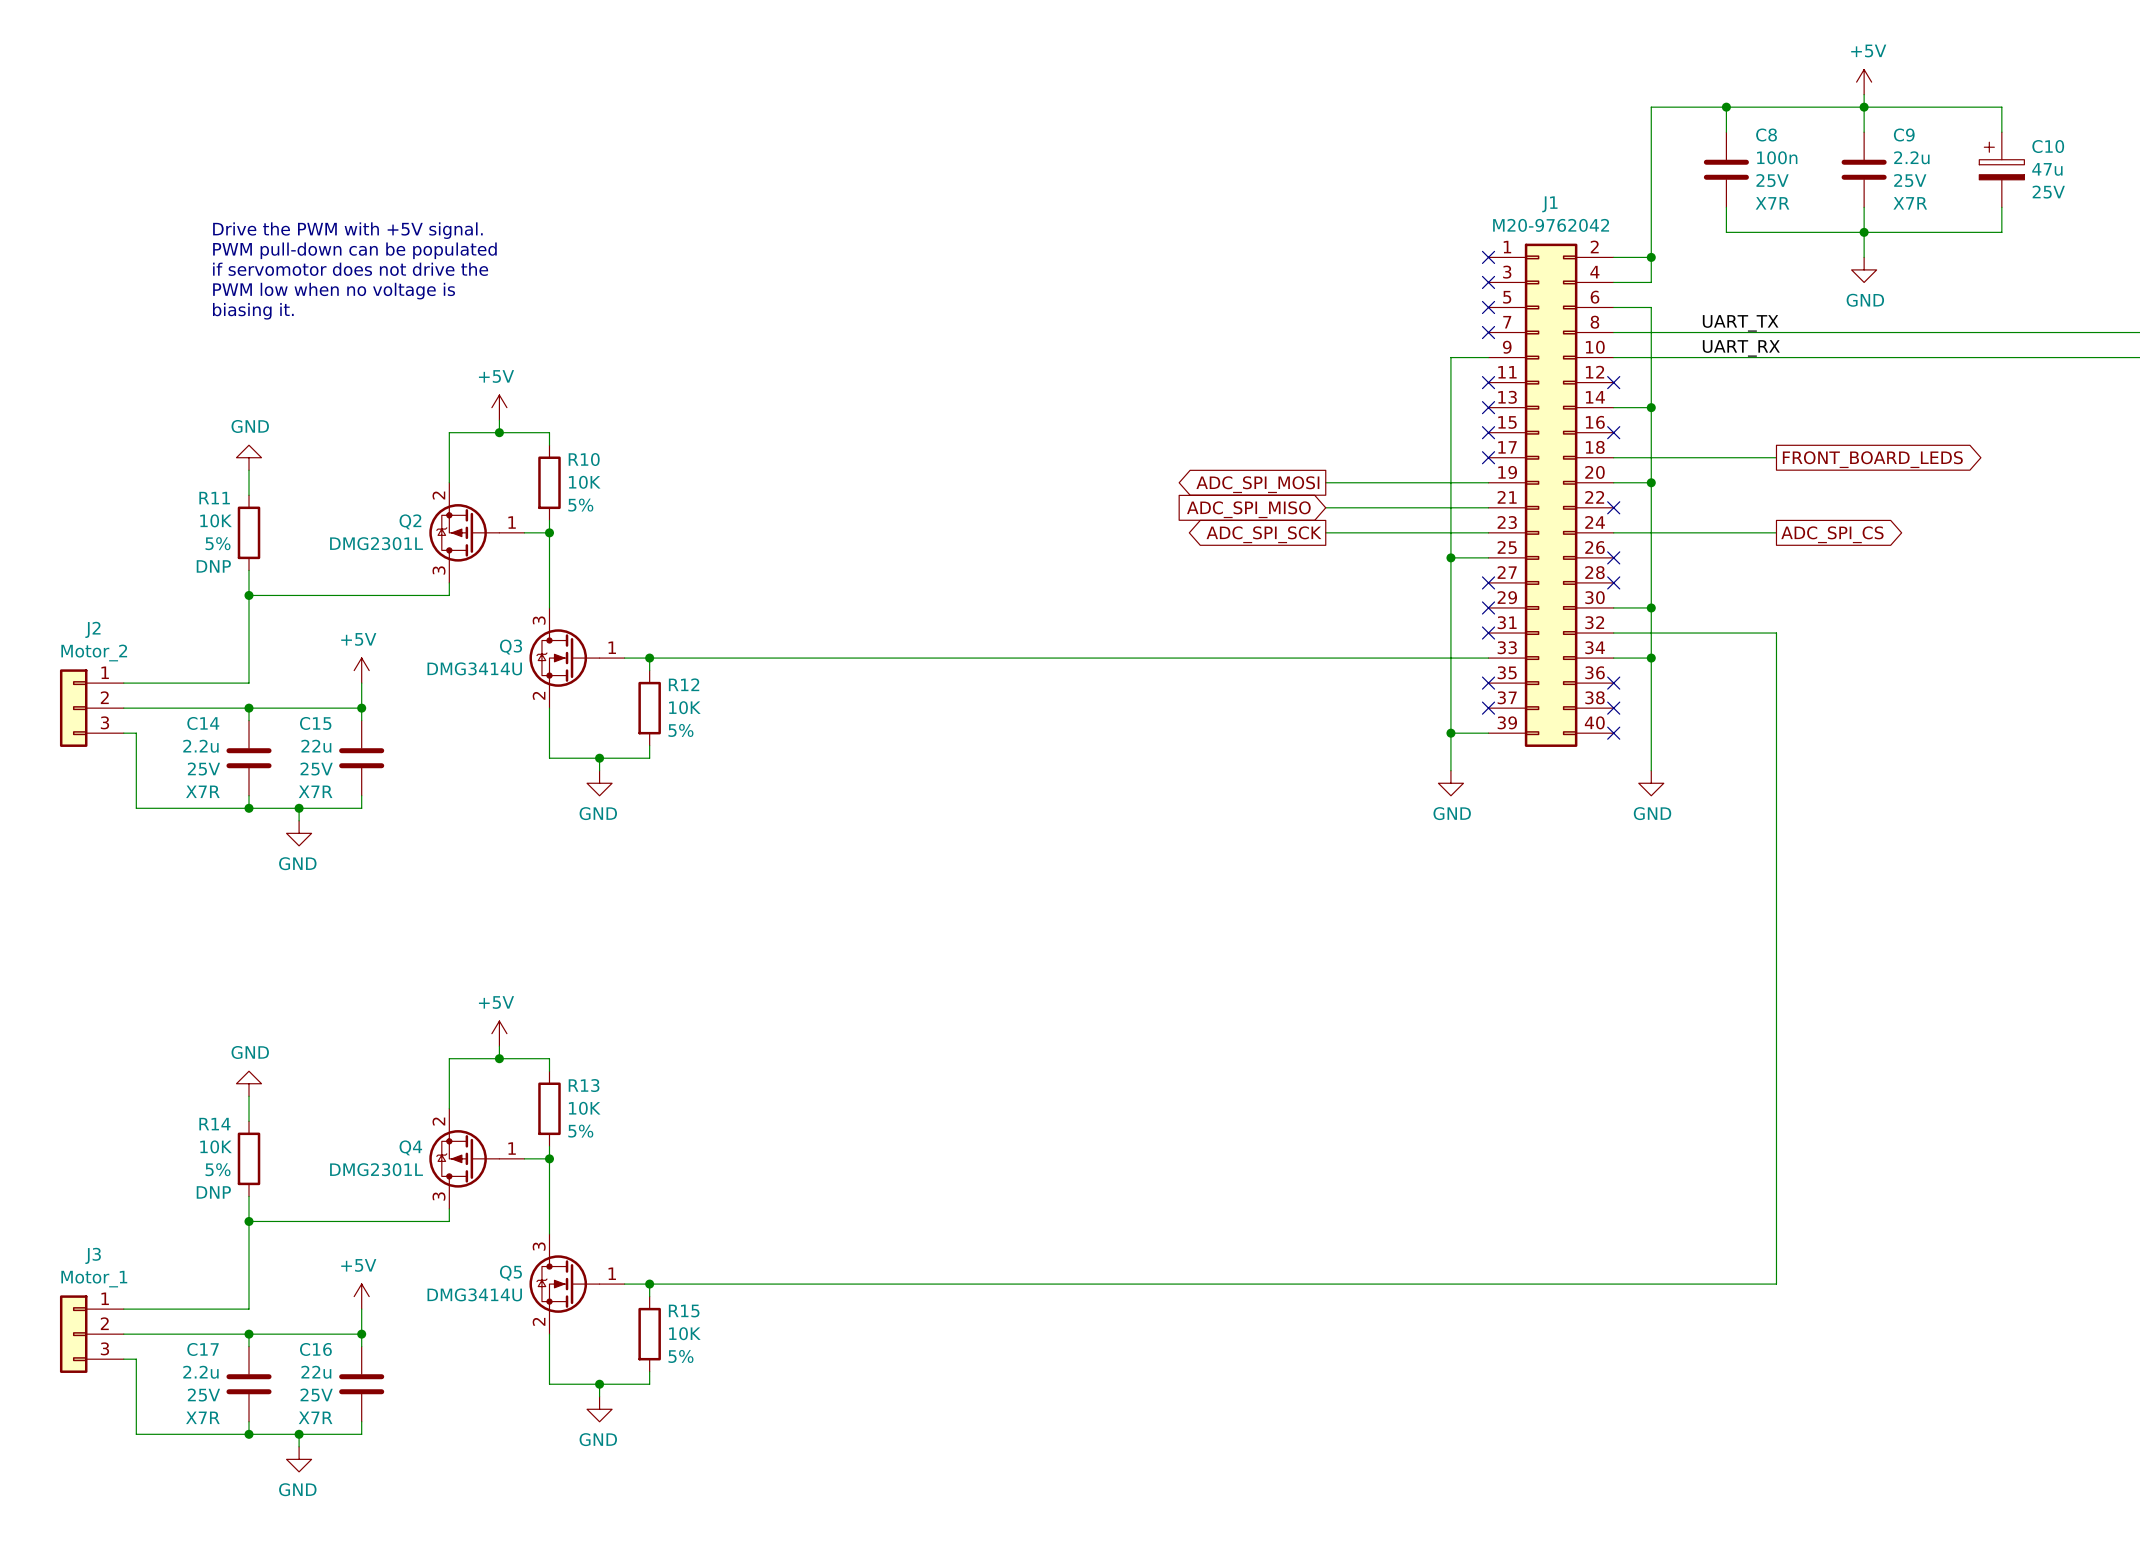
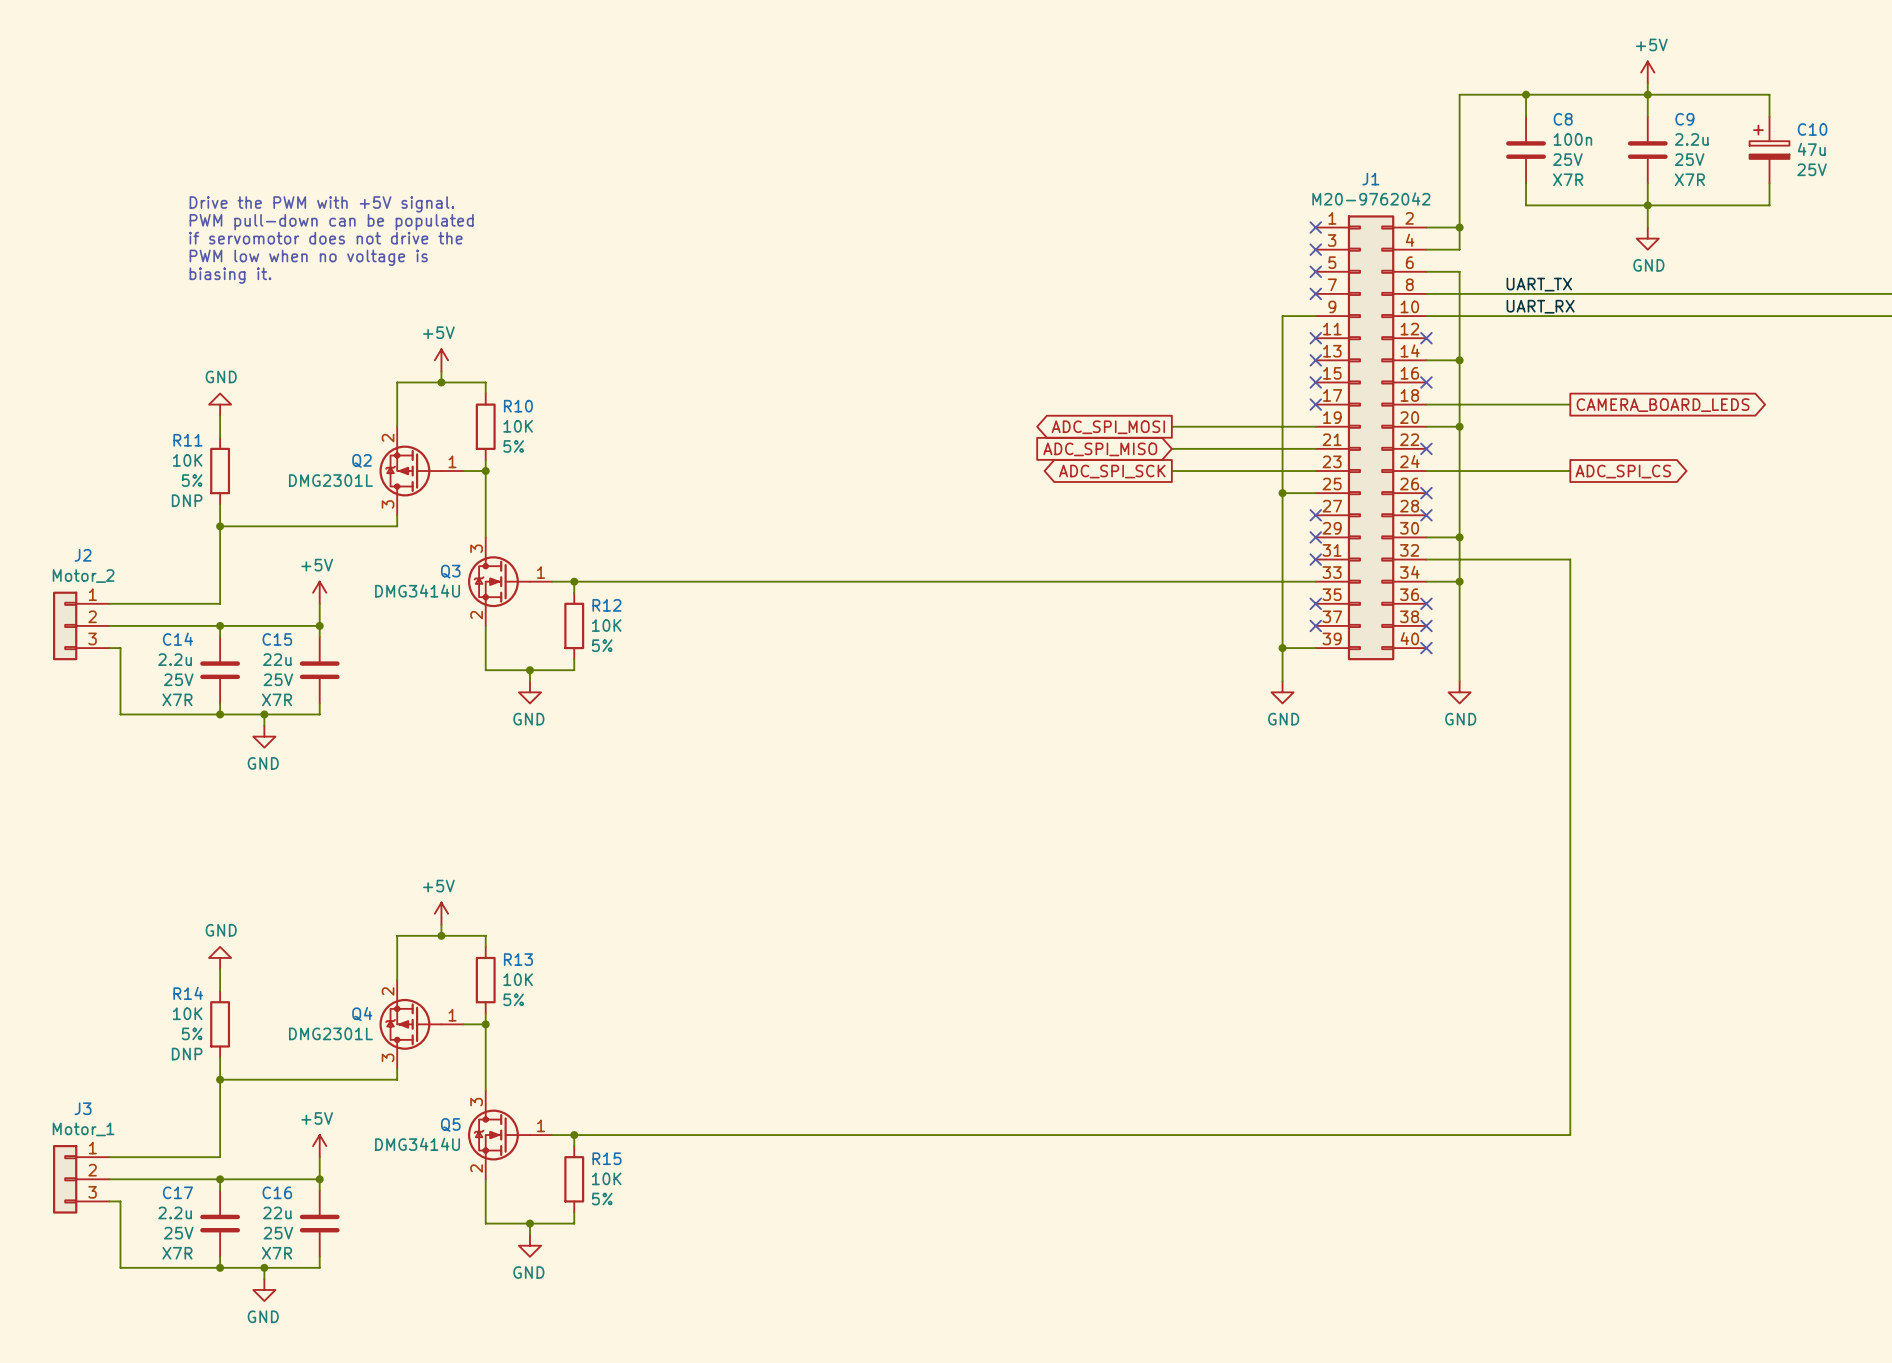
global label: FRONT_BOARD_LEDS (1872, 459) -> CAMERA_BOARD_LEDS (1663, 405)

